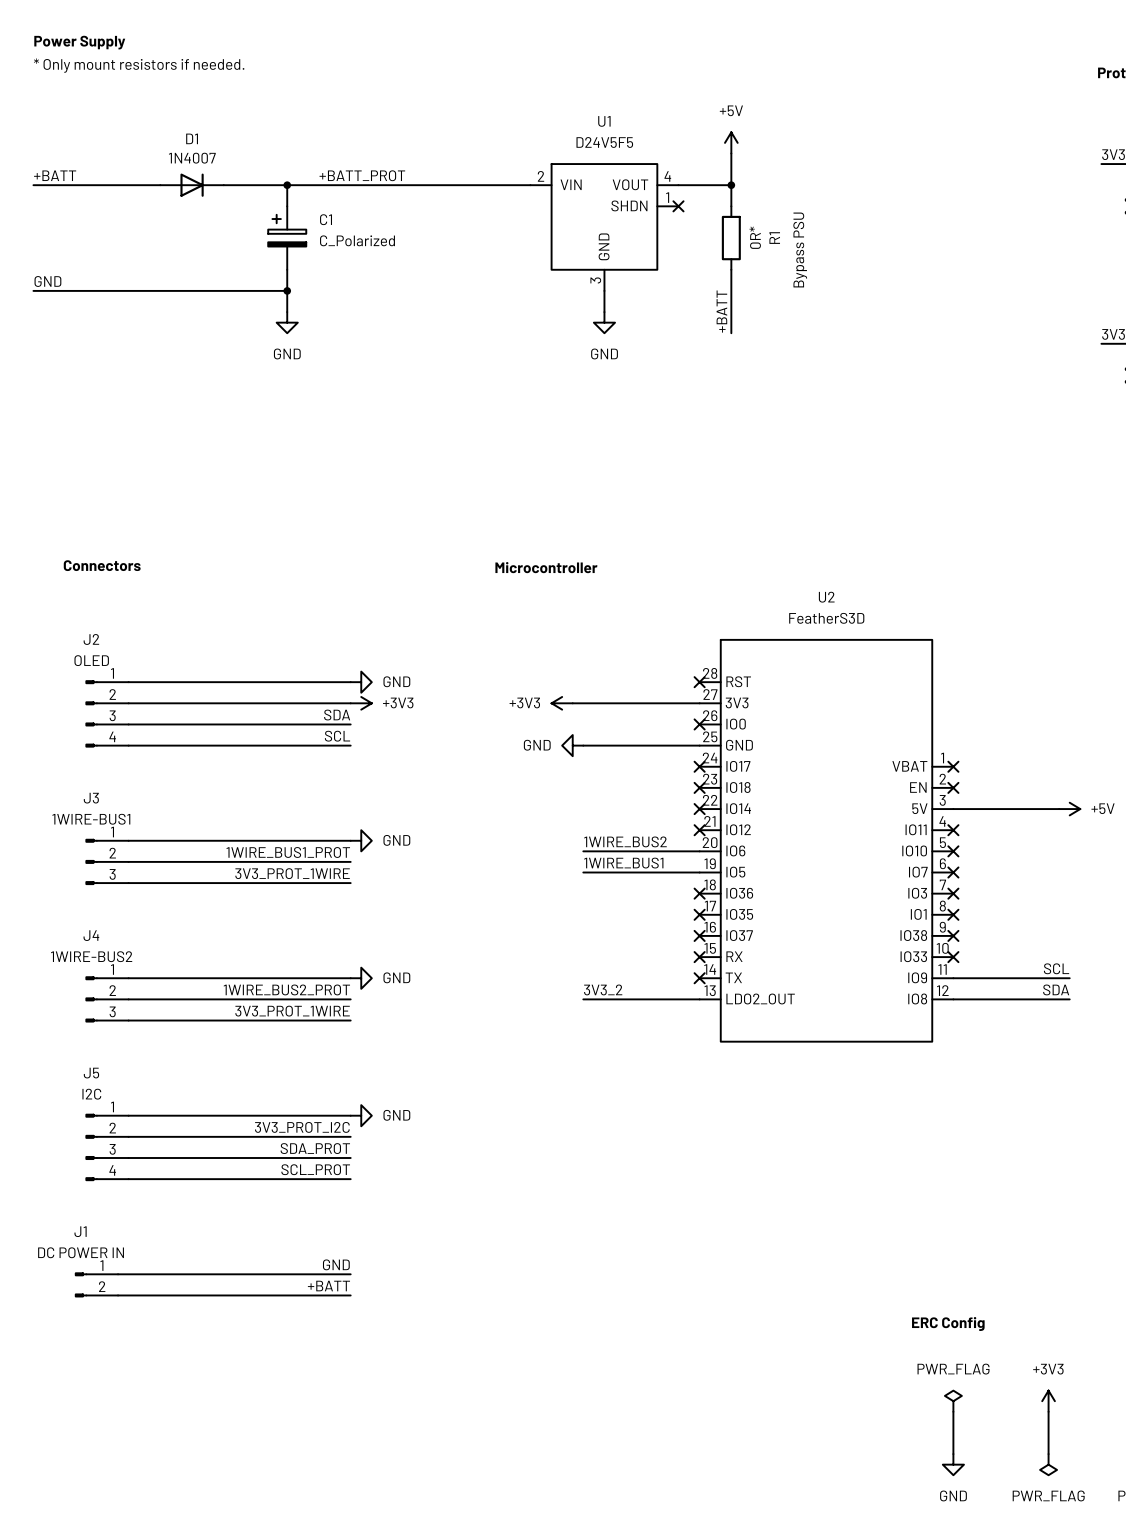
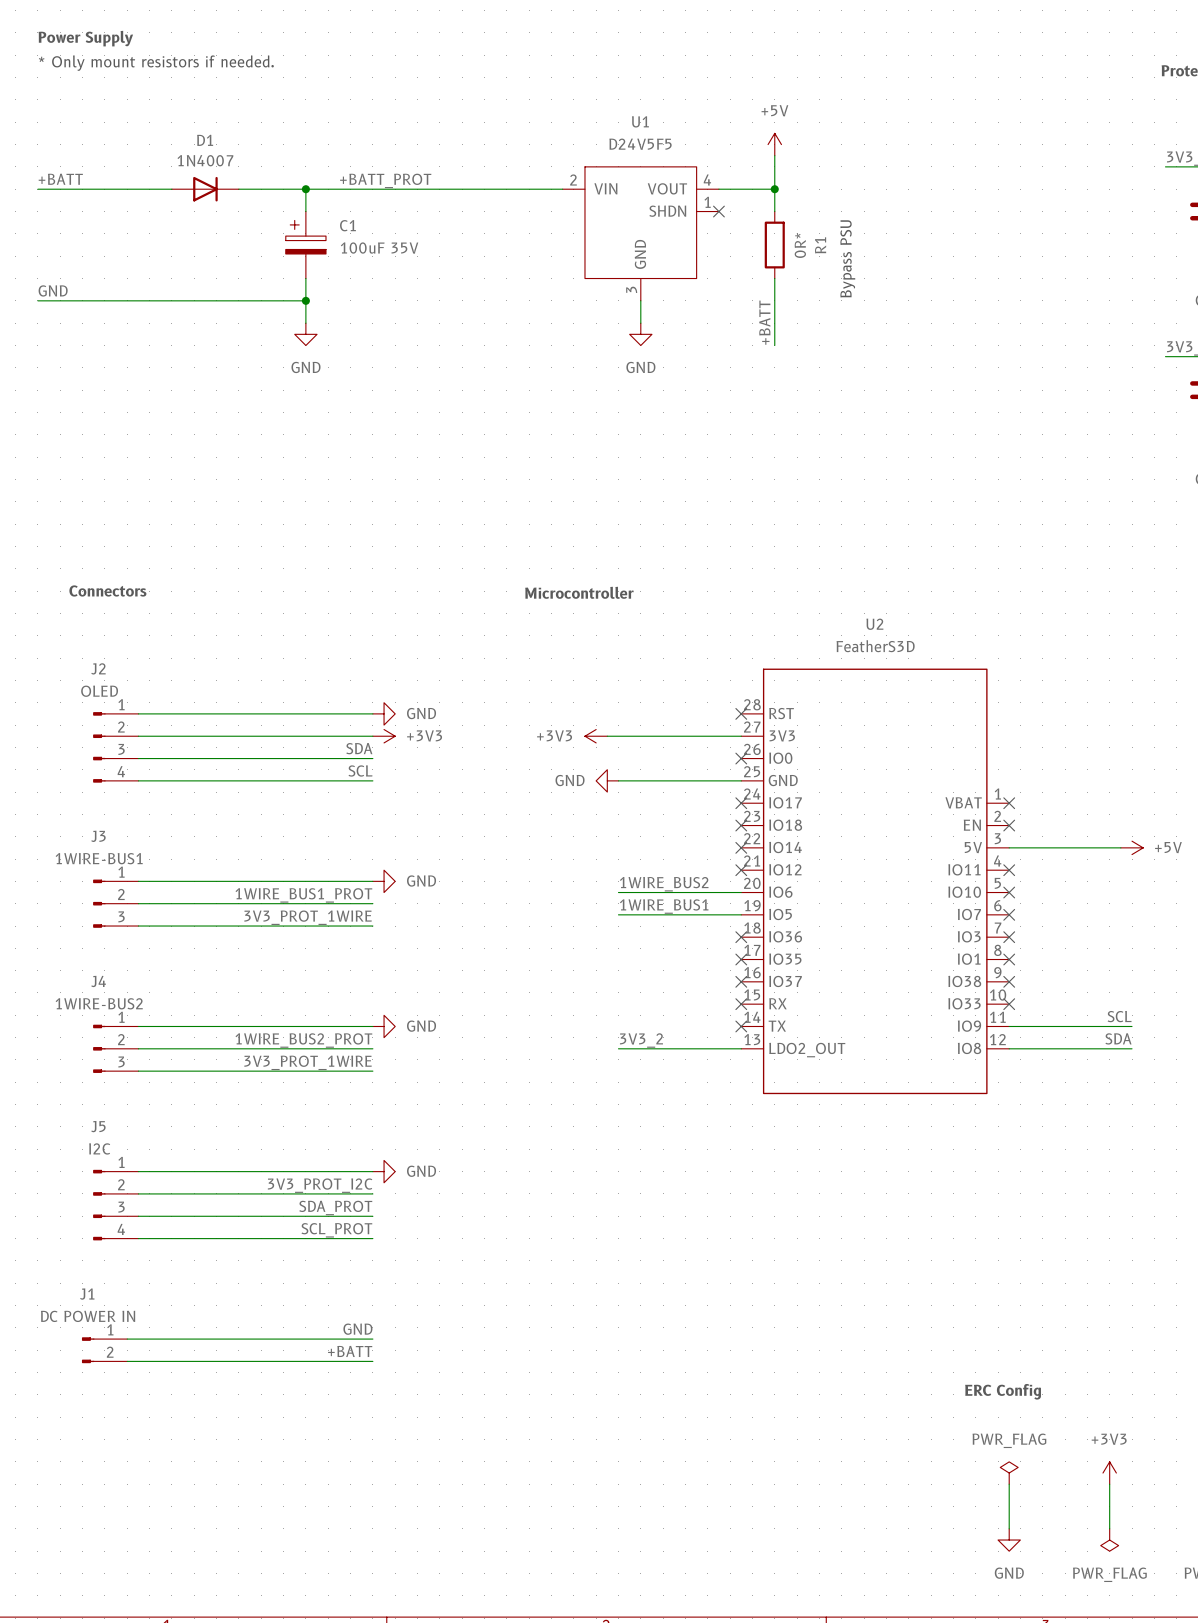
C1 value: C_Polarized (357, 240) -> 100uF 35V (379, 248)

